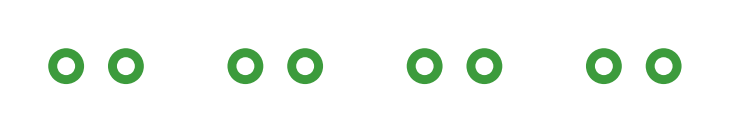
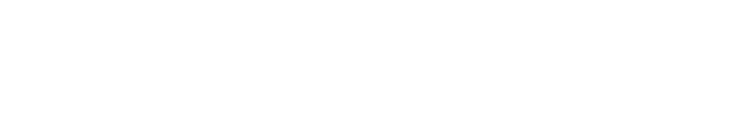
part: (96, 66) -> none
part: (275, 66) -> none
part: (454, 66) -> none
part: (633, 66) -> none

